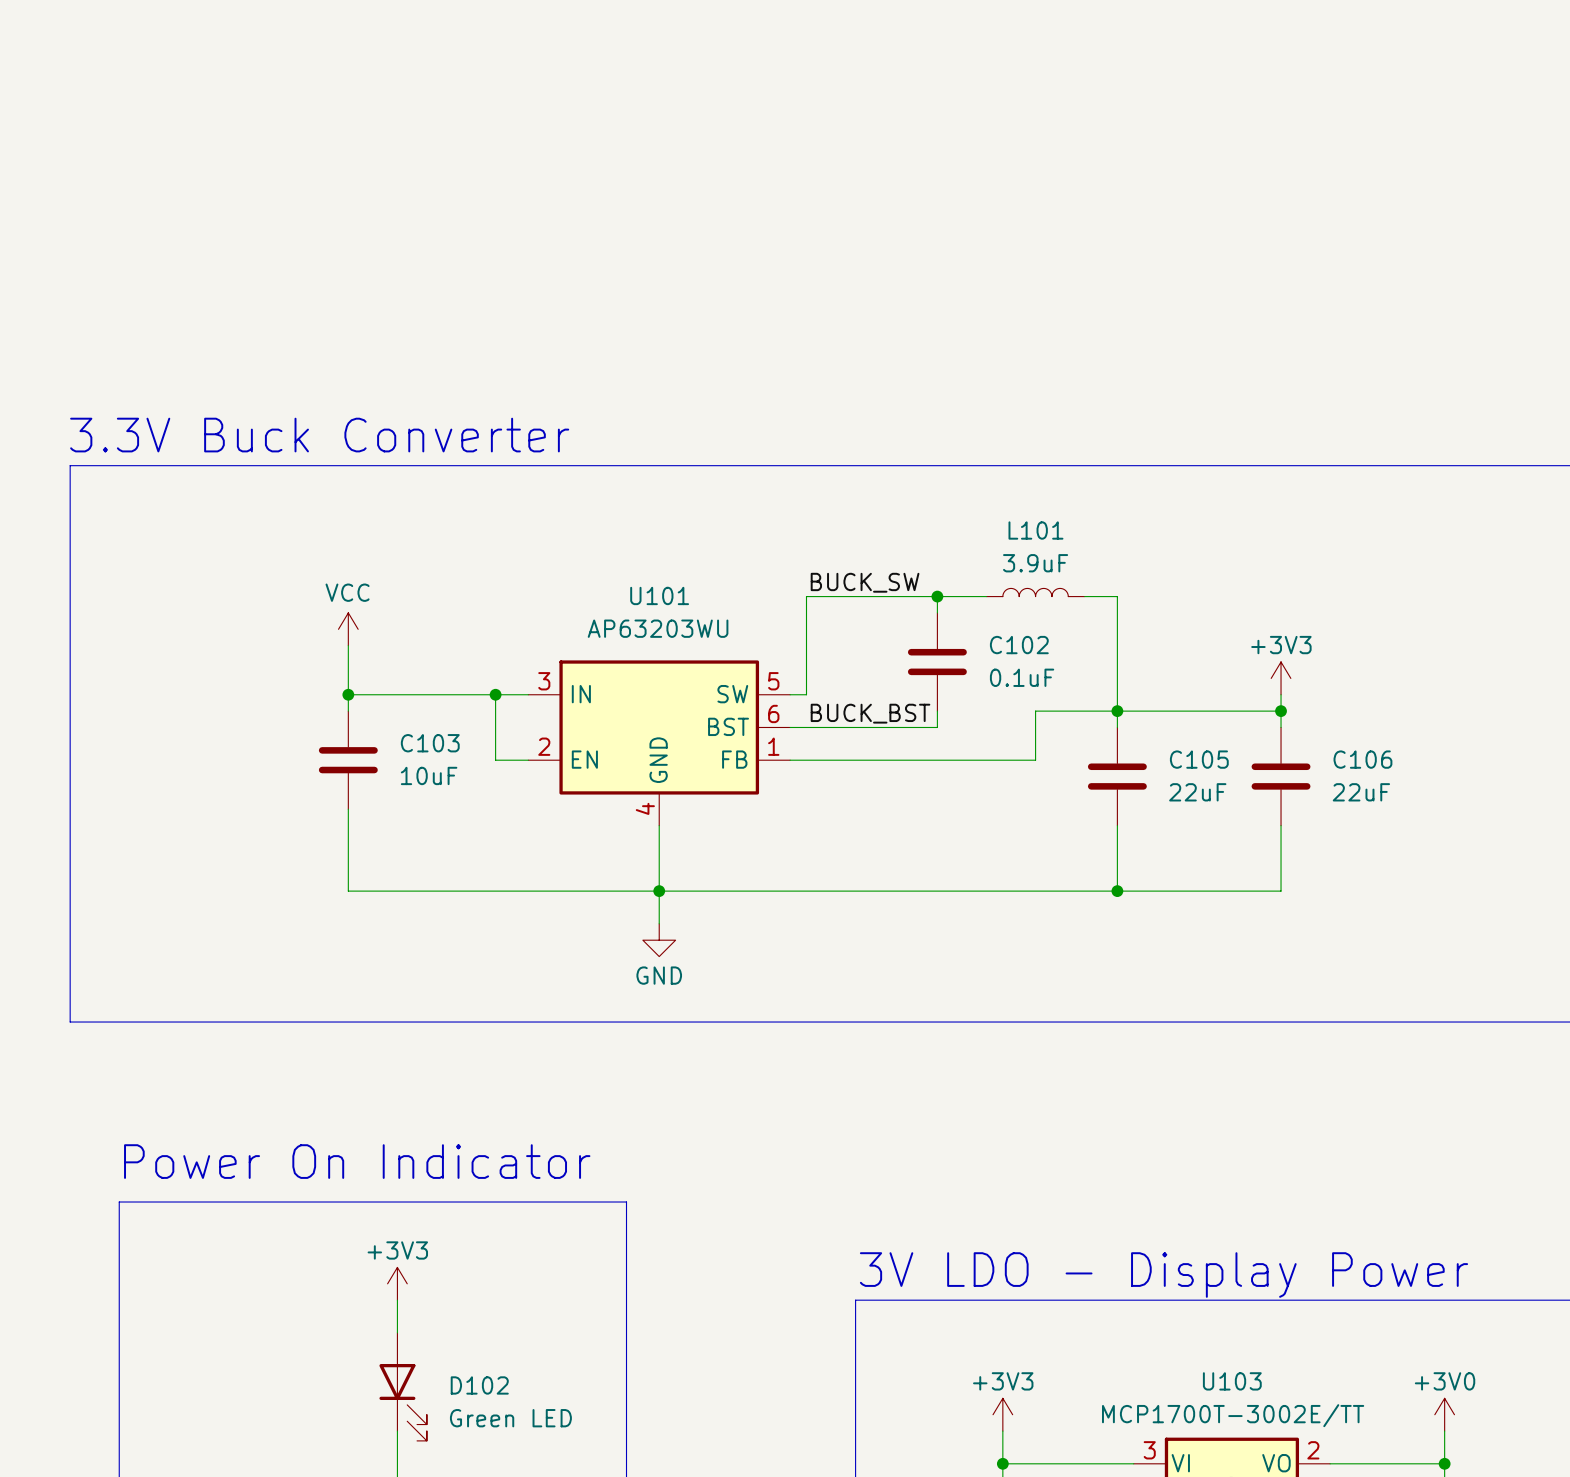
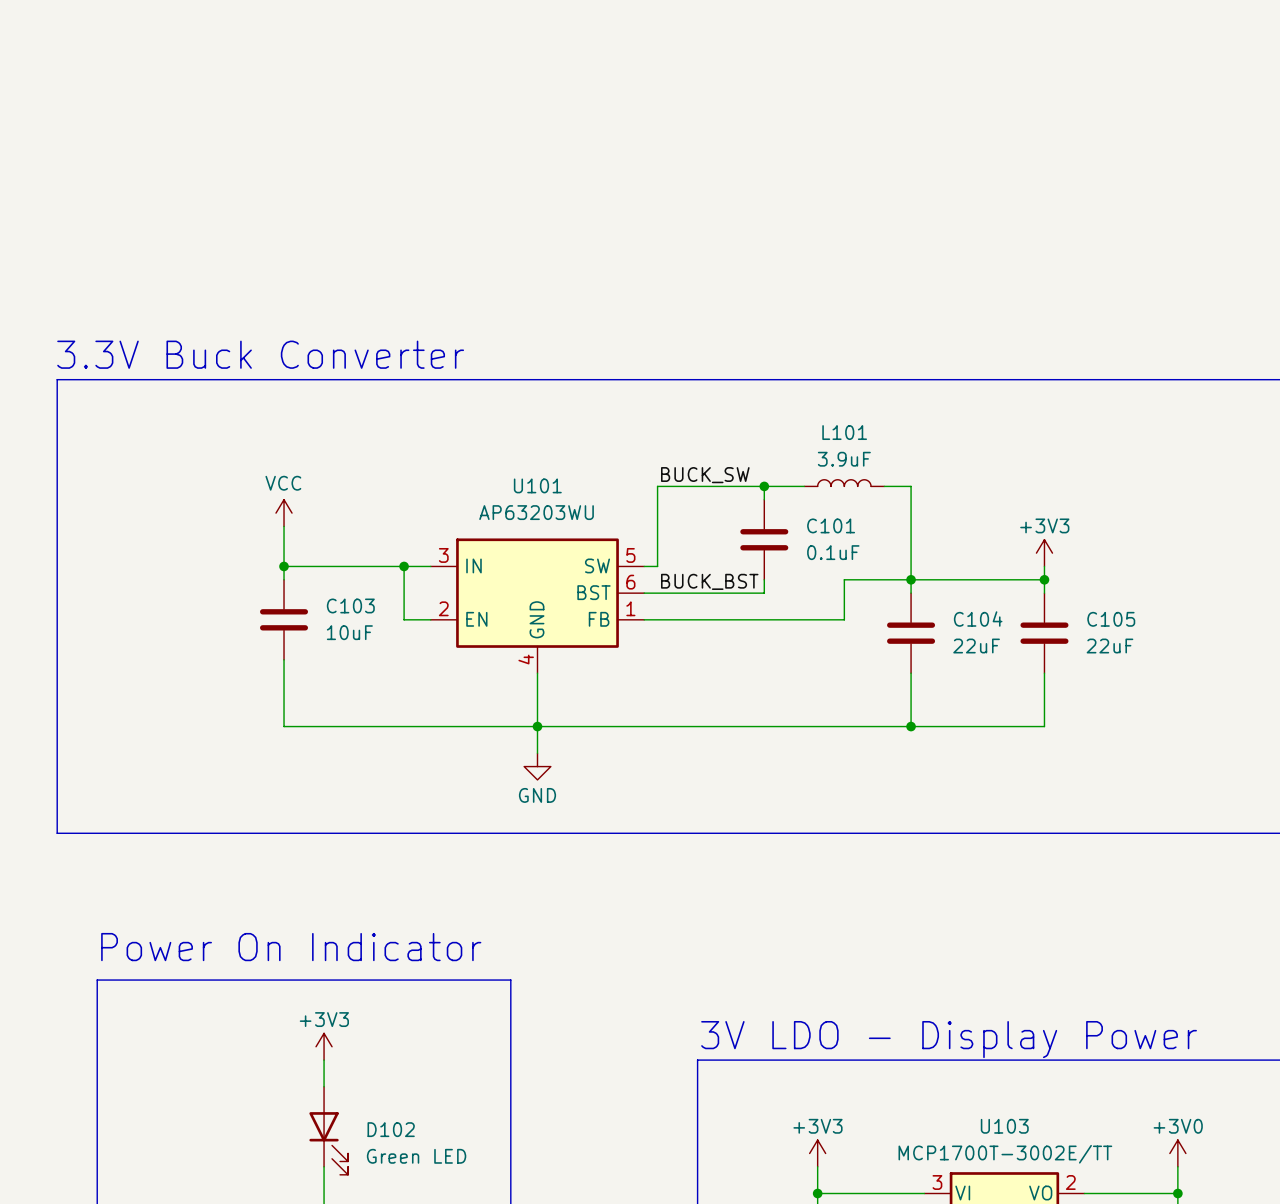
C102 name: C102 (1019, 645) -> C101 (831, 525)
C105 name: C105 (1199, 759) -> C104 (978, 619)
C106 name: C106 (1362, 759) -> C105 (1111, 619)

